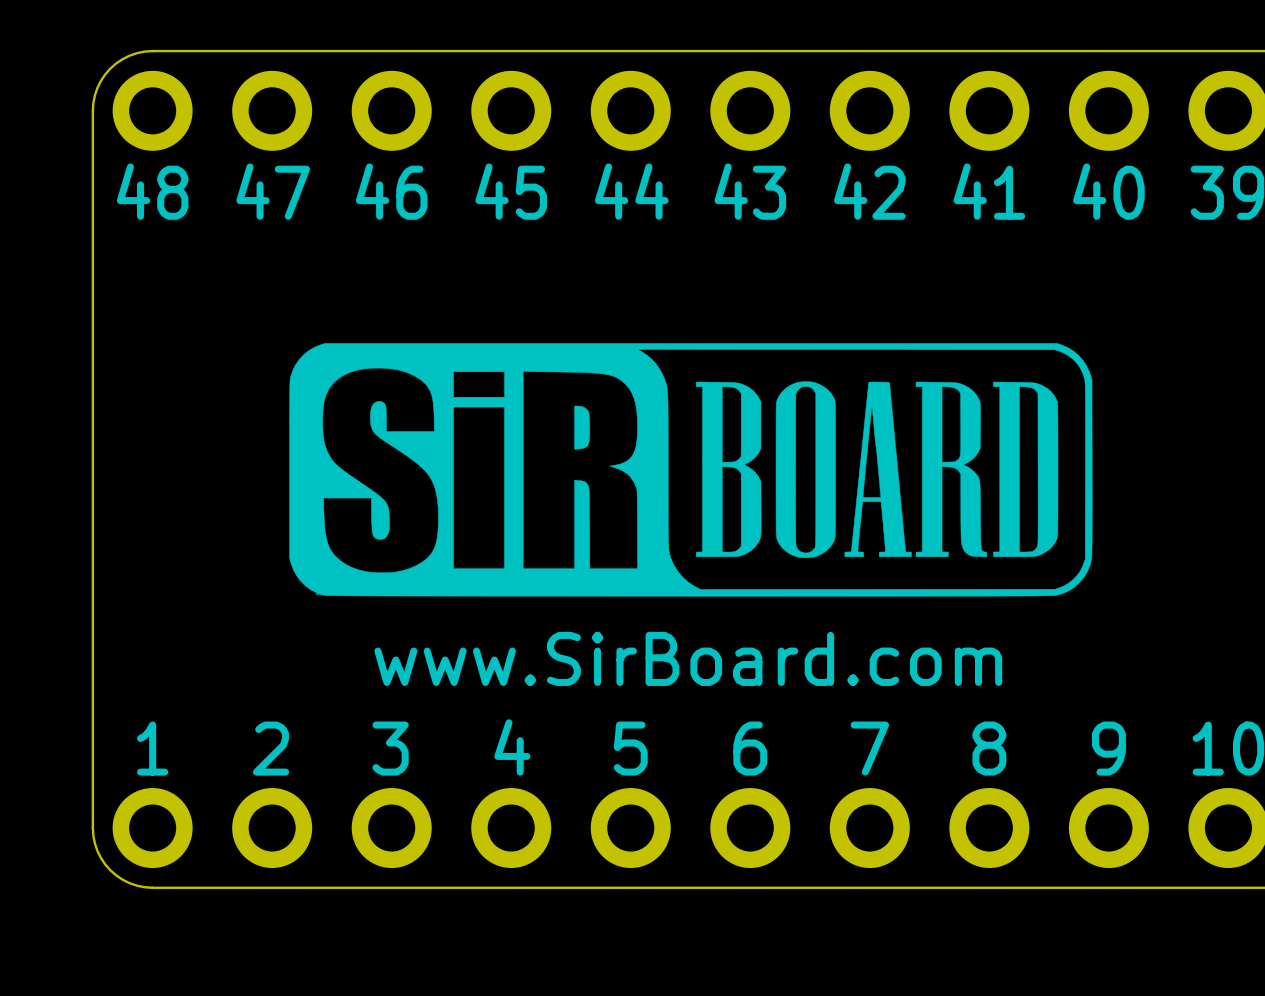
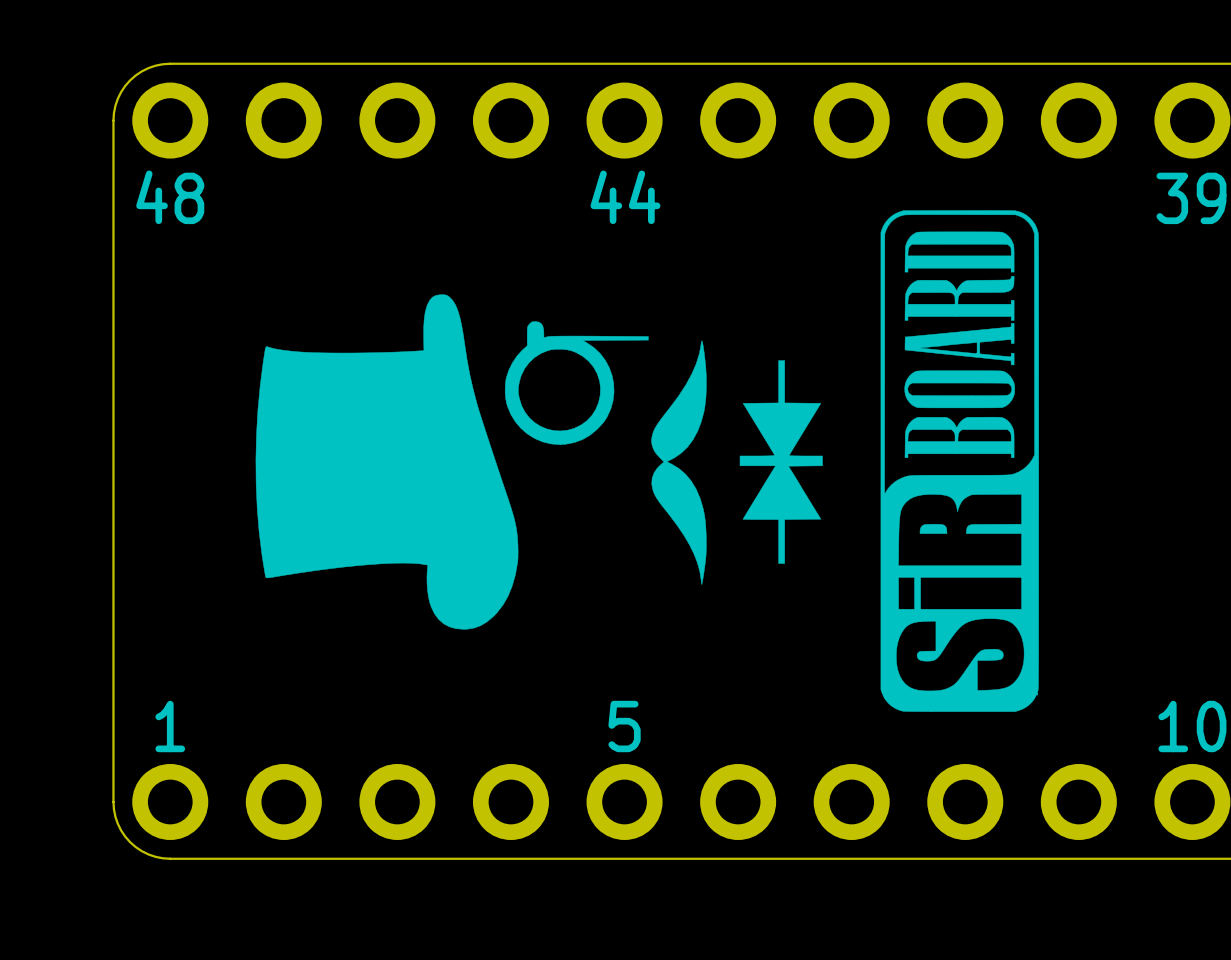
text: 47 (273, 191) -> none
text: 46 (391, 191) -> none
text: 45 (511, 191) -> none
text: 43 (750, 191) -> none
text: 42 (869, 191) -> none
text: 41 (989, 191) -> none
text: 40 (1108, 191) -> none
drawing: none -> [880, 210, 1039, 712]
drawing: none -> [255, 294, 823, 630]
drawing: [289, 343, 1093, 597] -> none
text: www.SirBoard.com (688, 658) -> none
text: 4 (512, 747) -> none
text: 2 (271, 748) -> none
text: 3 (390, 748) -> none
text: 6 (750, 748) -> none
text: 7 (869, 748) -> none
text: 8 (989, 748) -> none
text: 9 (1108, 748) -> none

